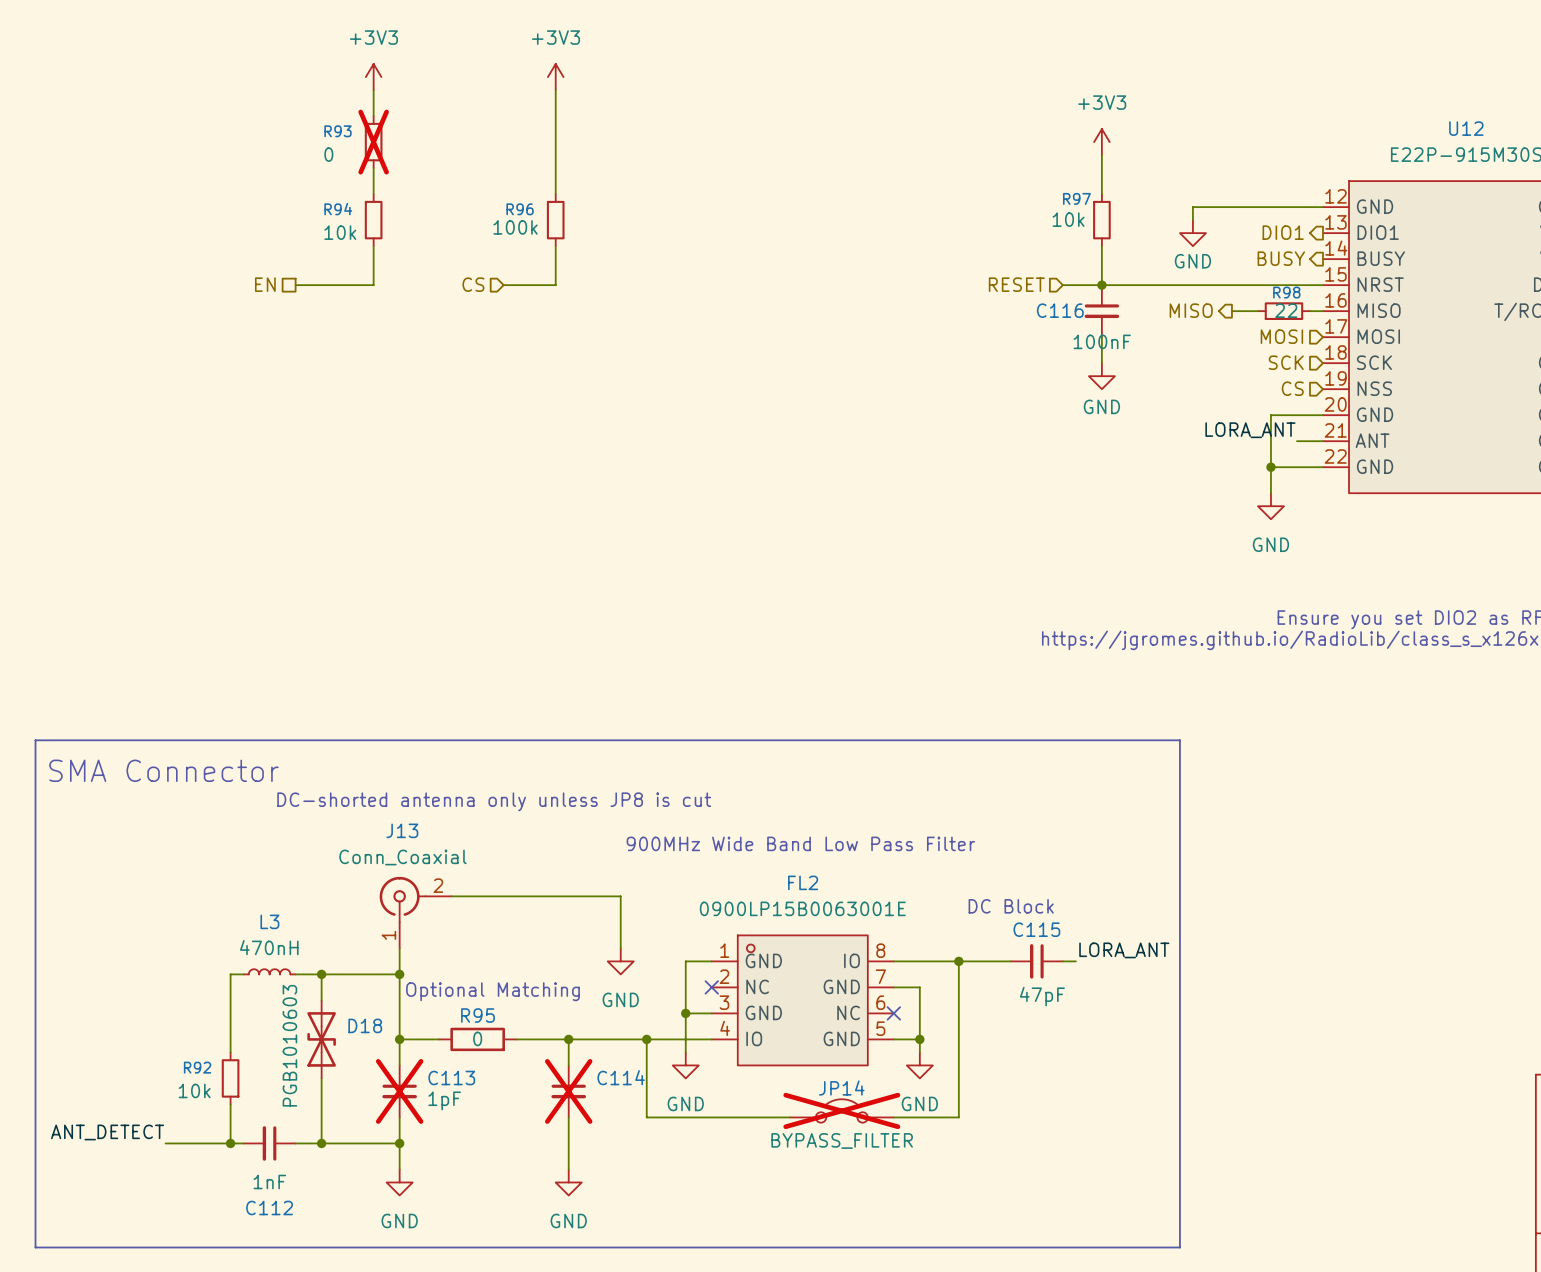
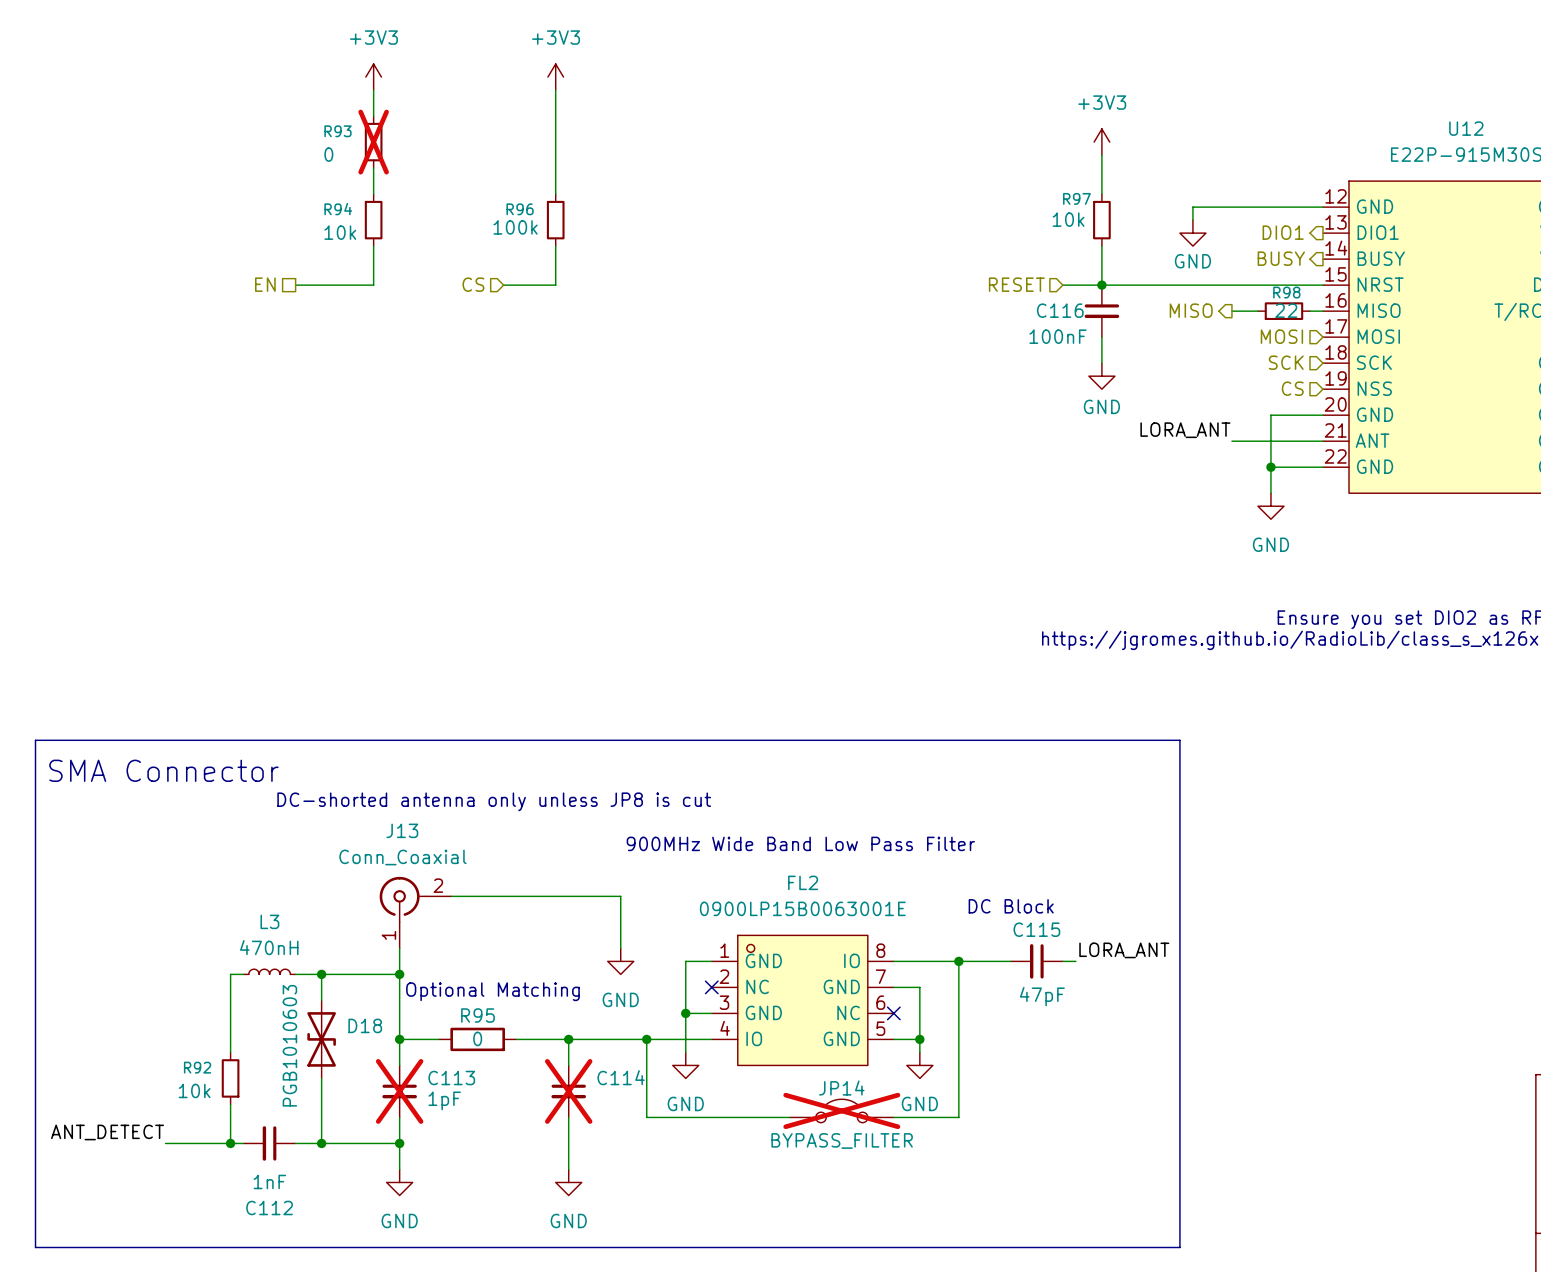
C116 value position: 100nF (1102, 341) -> 100nF (1058, 336)
label position: LORA_ANT (1250, 430) -> LORA_ANT (1185, 430)
wire: none -> (1231, 441) (1296, 441)

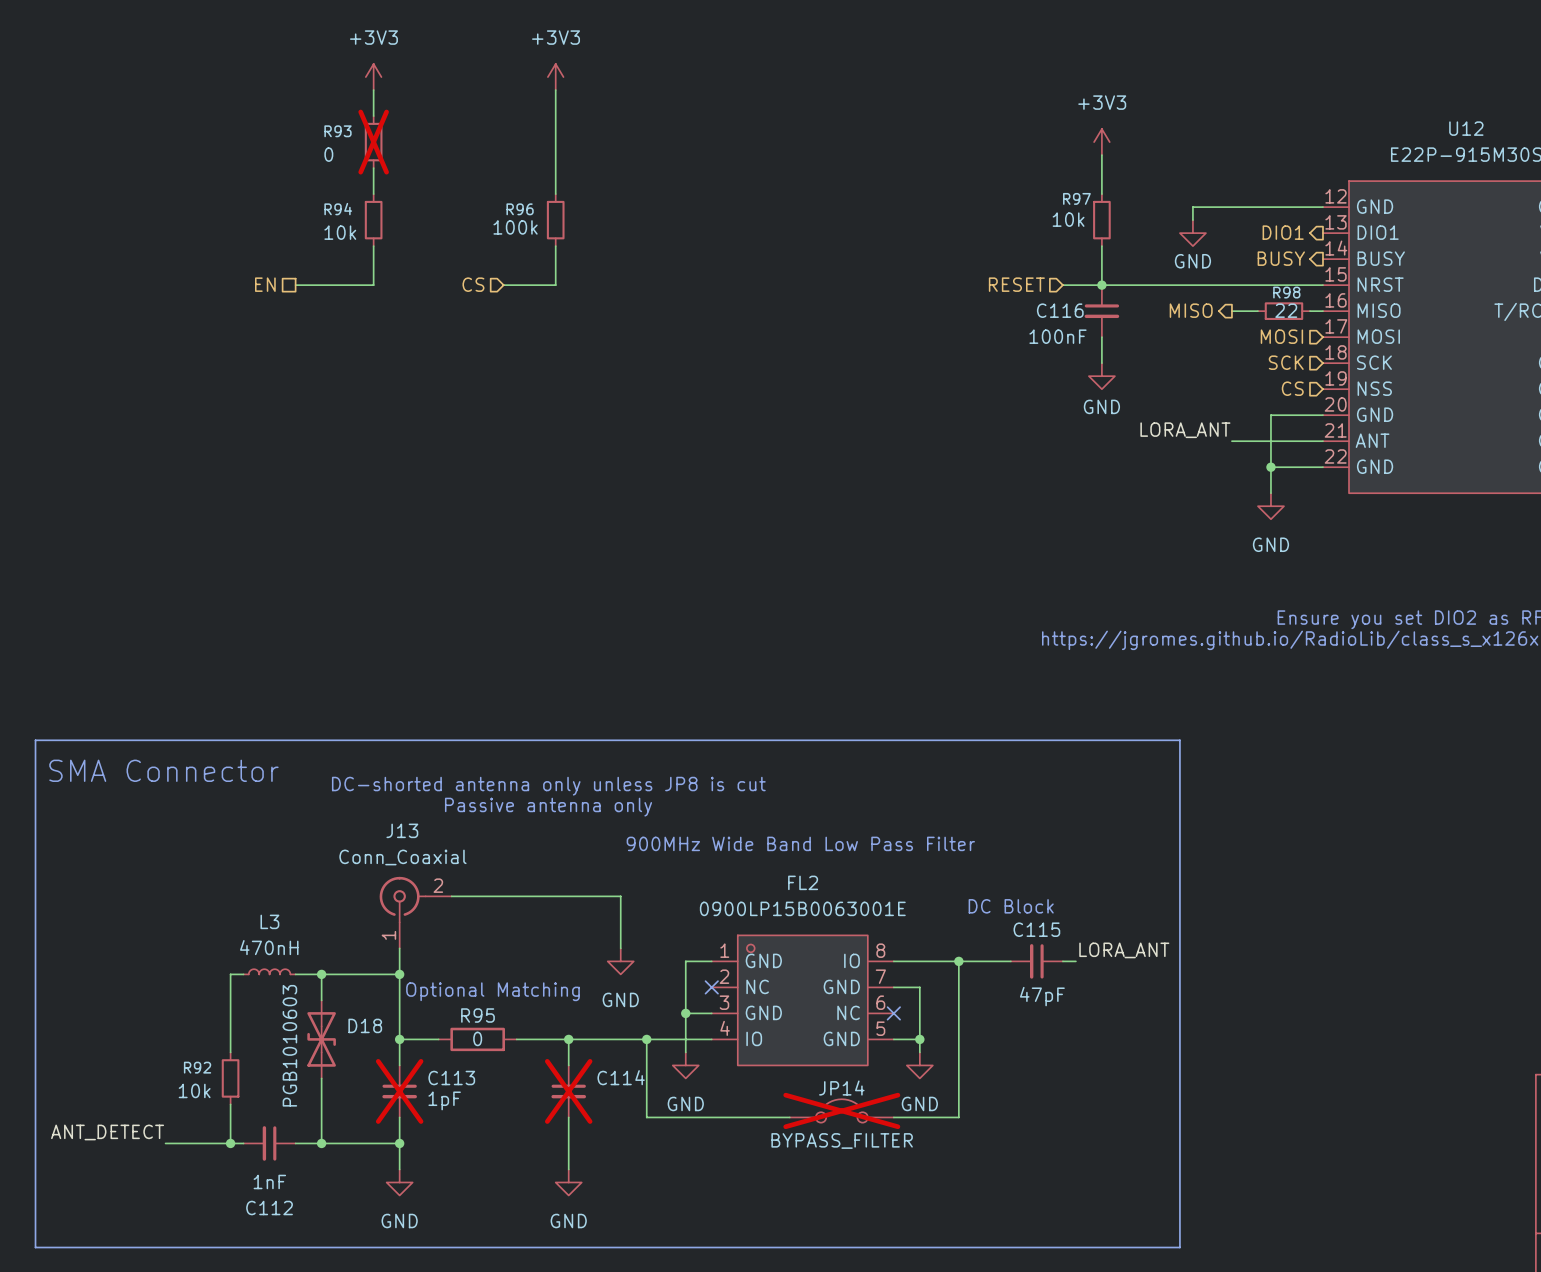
text position: DC-shorted antenna only unless JP8 is cut (494, 801) -> DC-shorted antenna only unless JP8 is cut (548, 786)
text: none -> Passive antenna only (548, 807)

